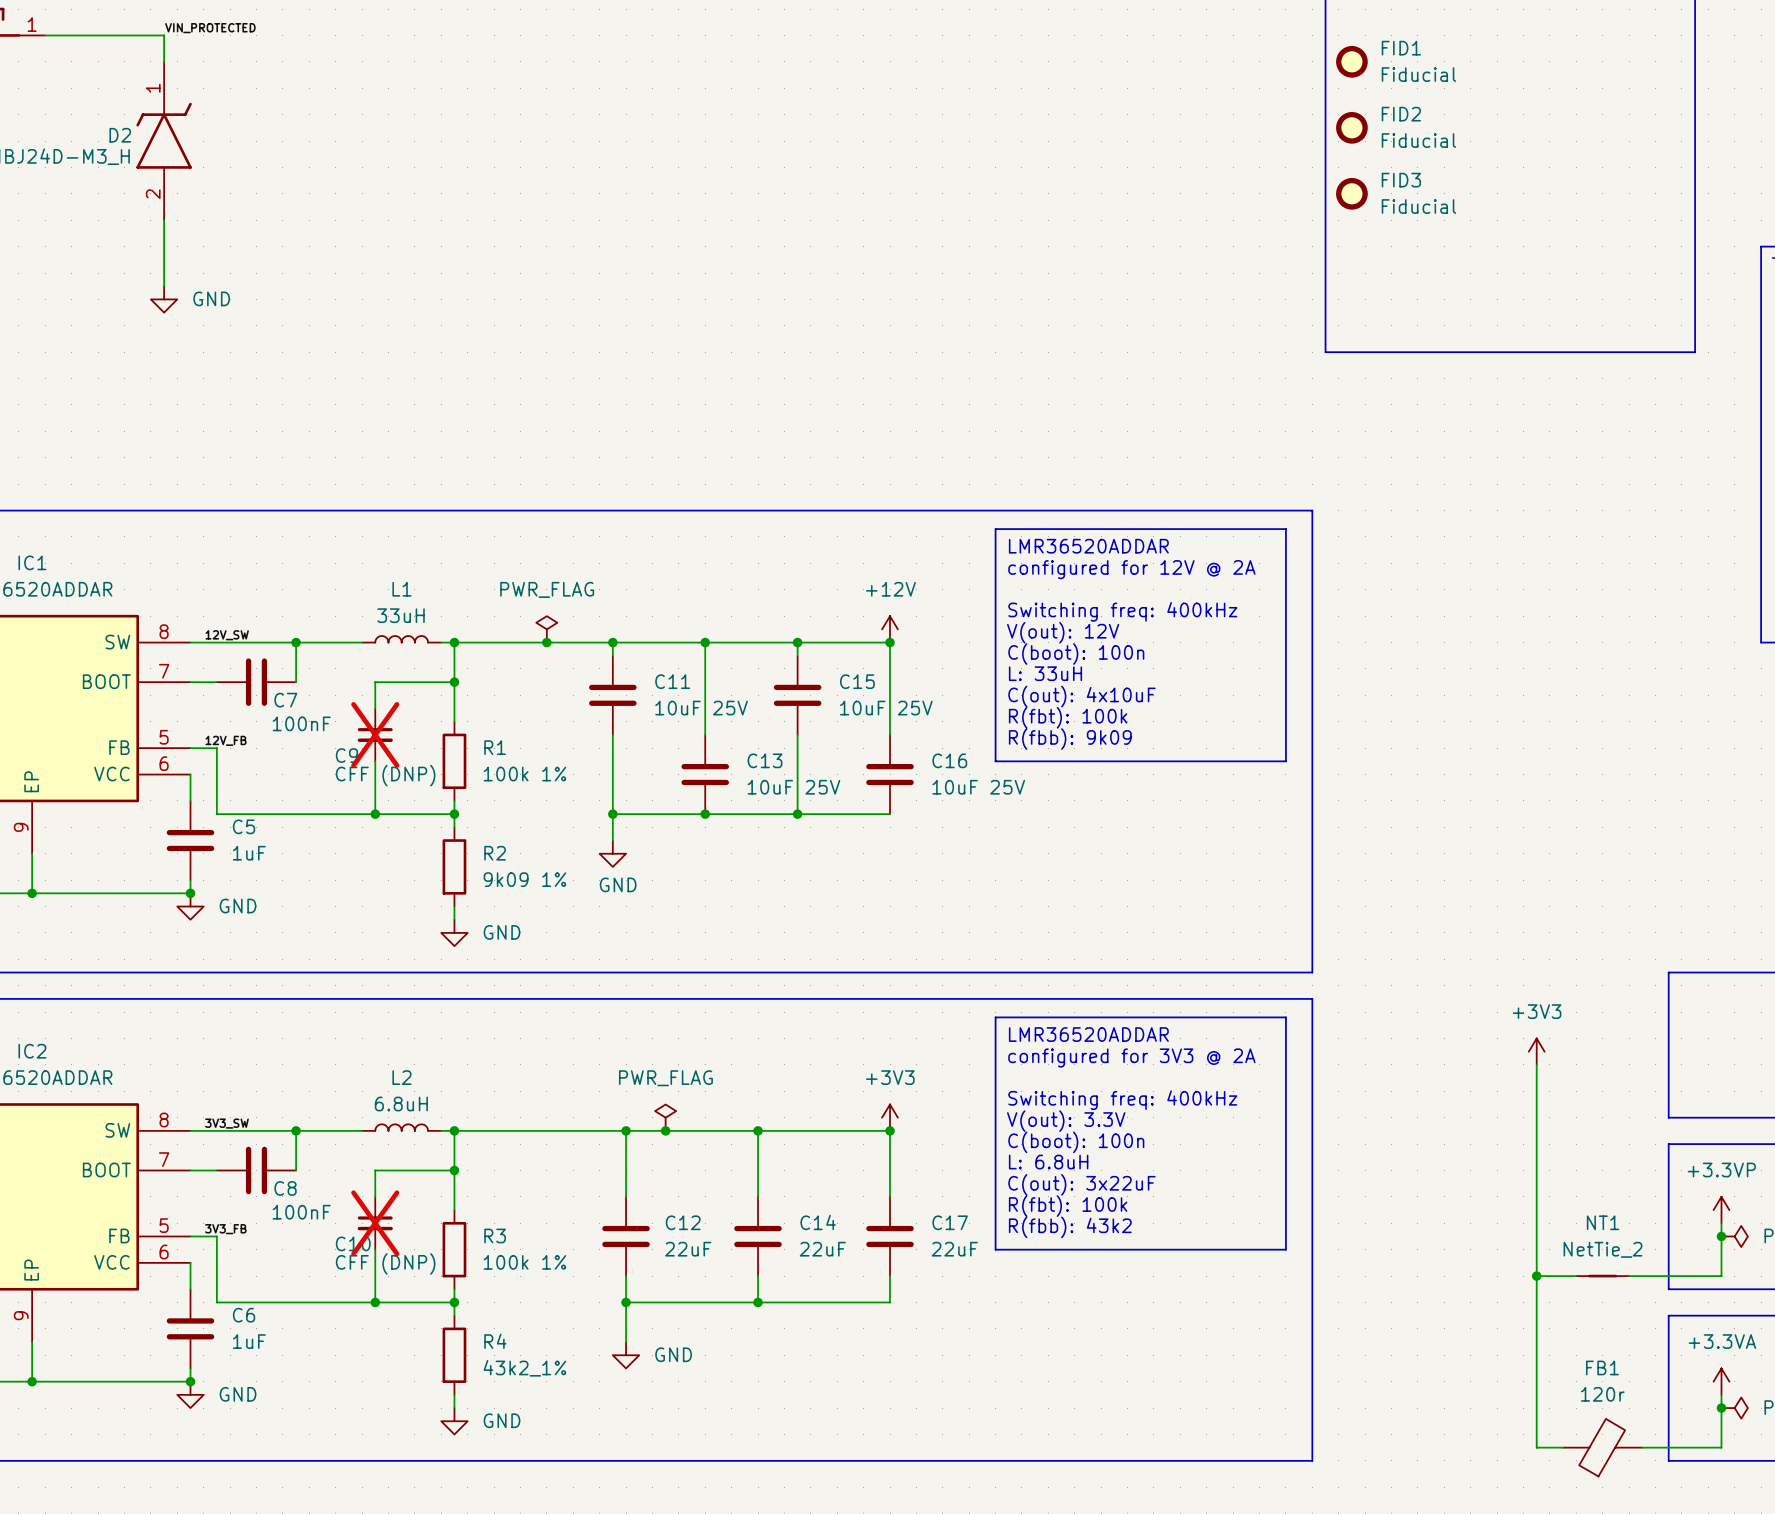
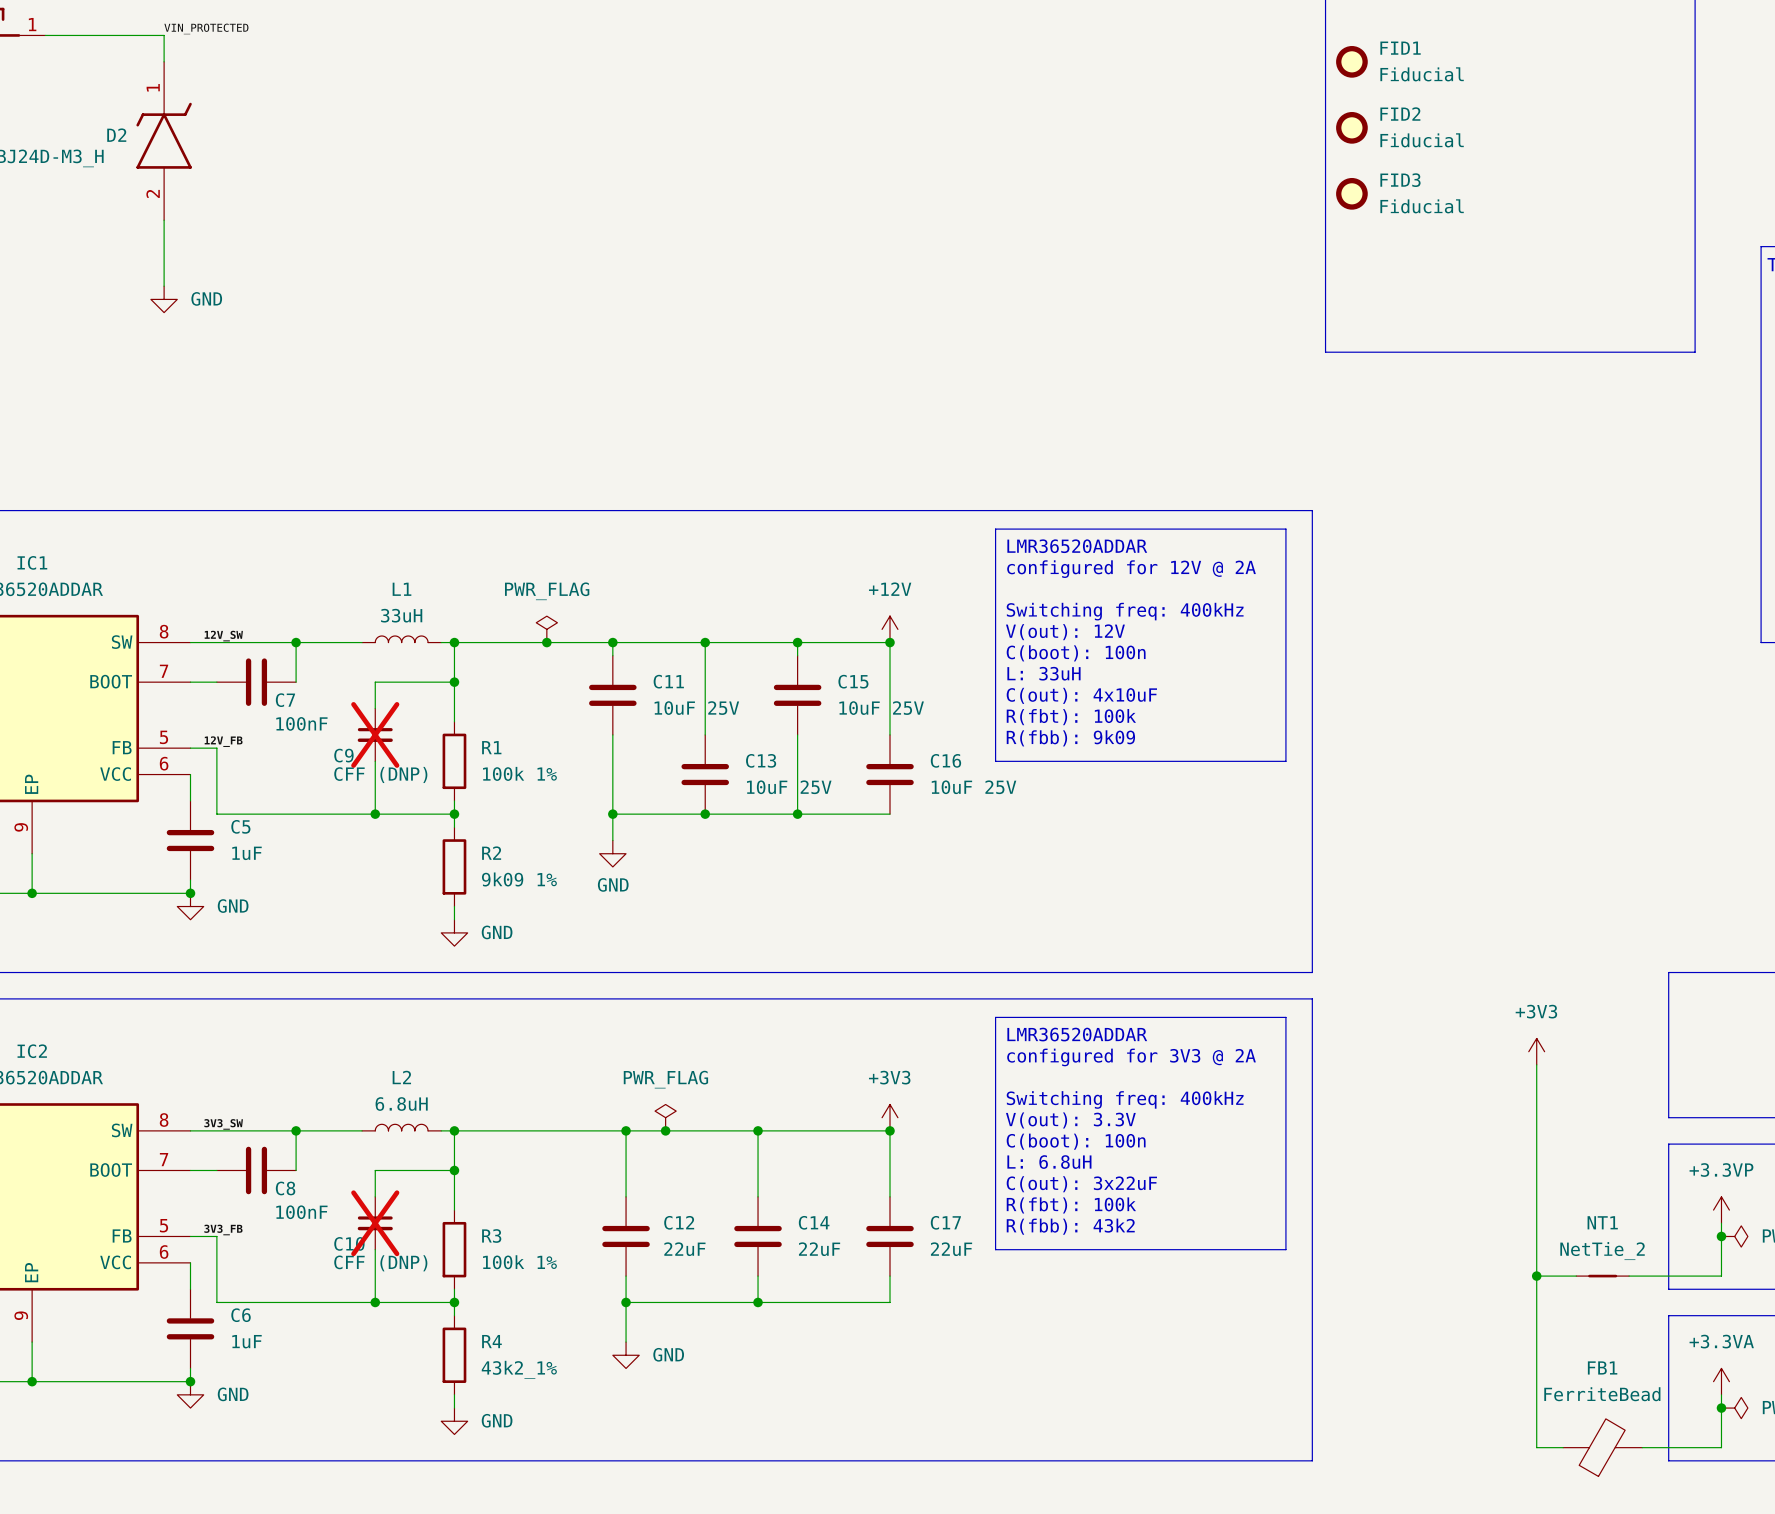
FB1 value: 120r (1602, 1394) -> FerriteBead (1602, 1394)

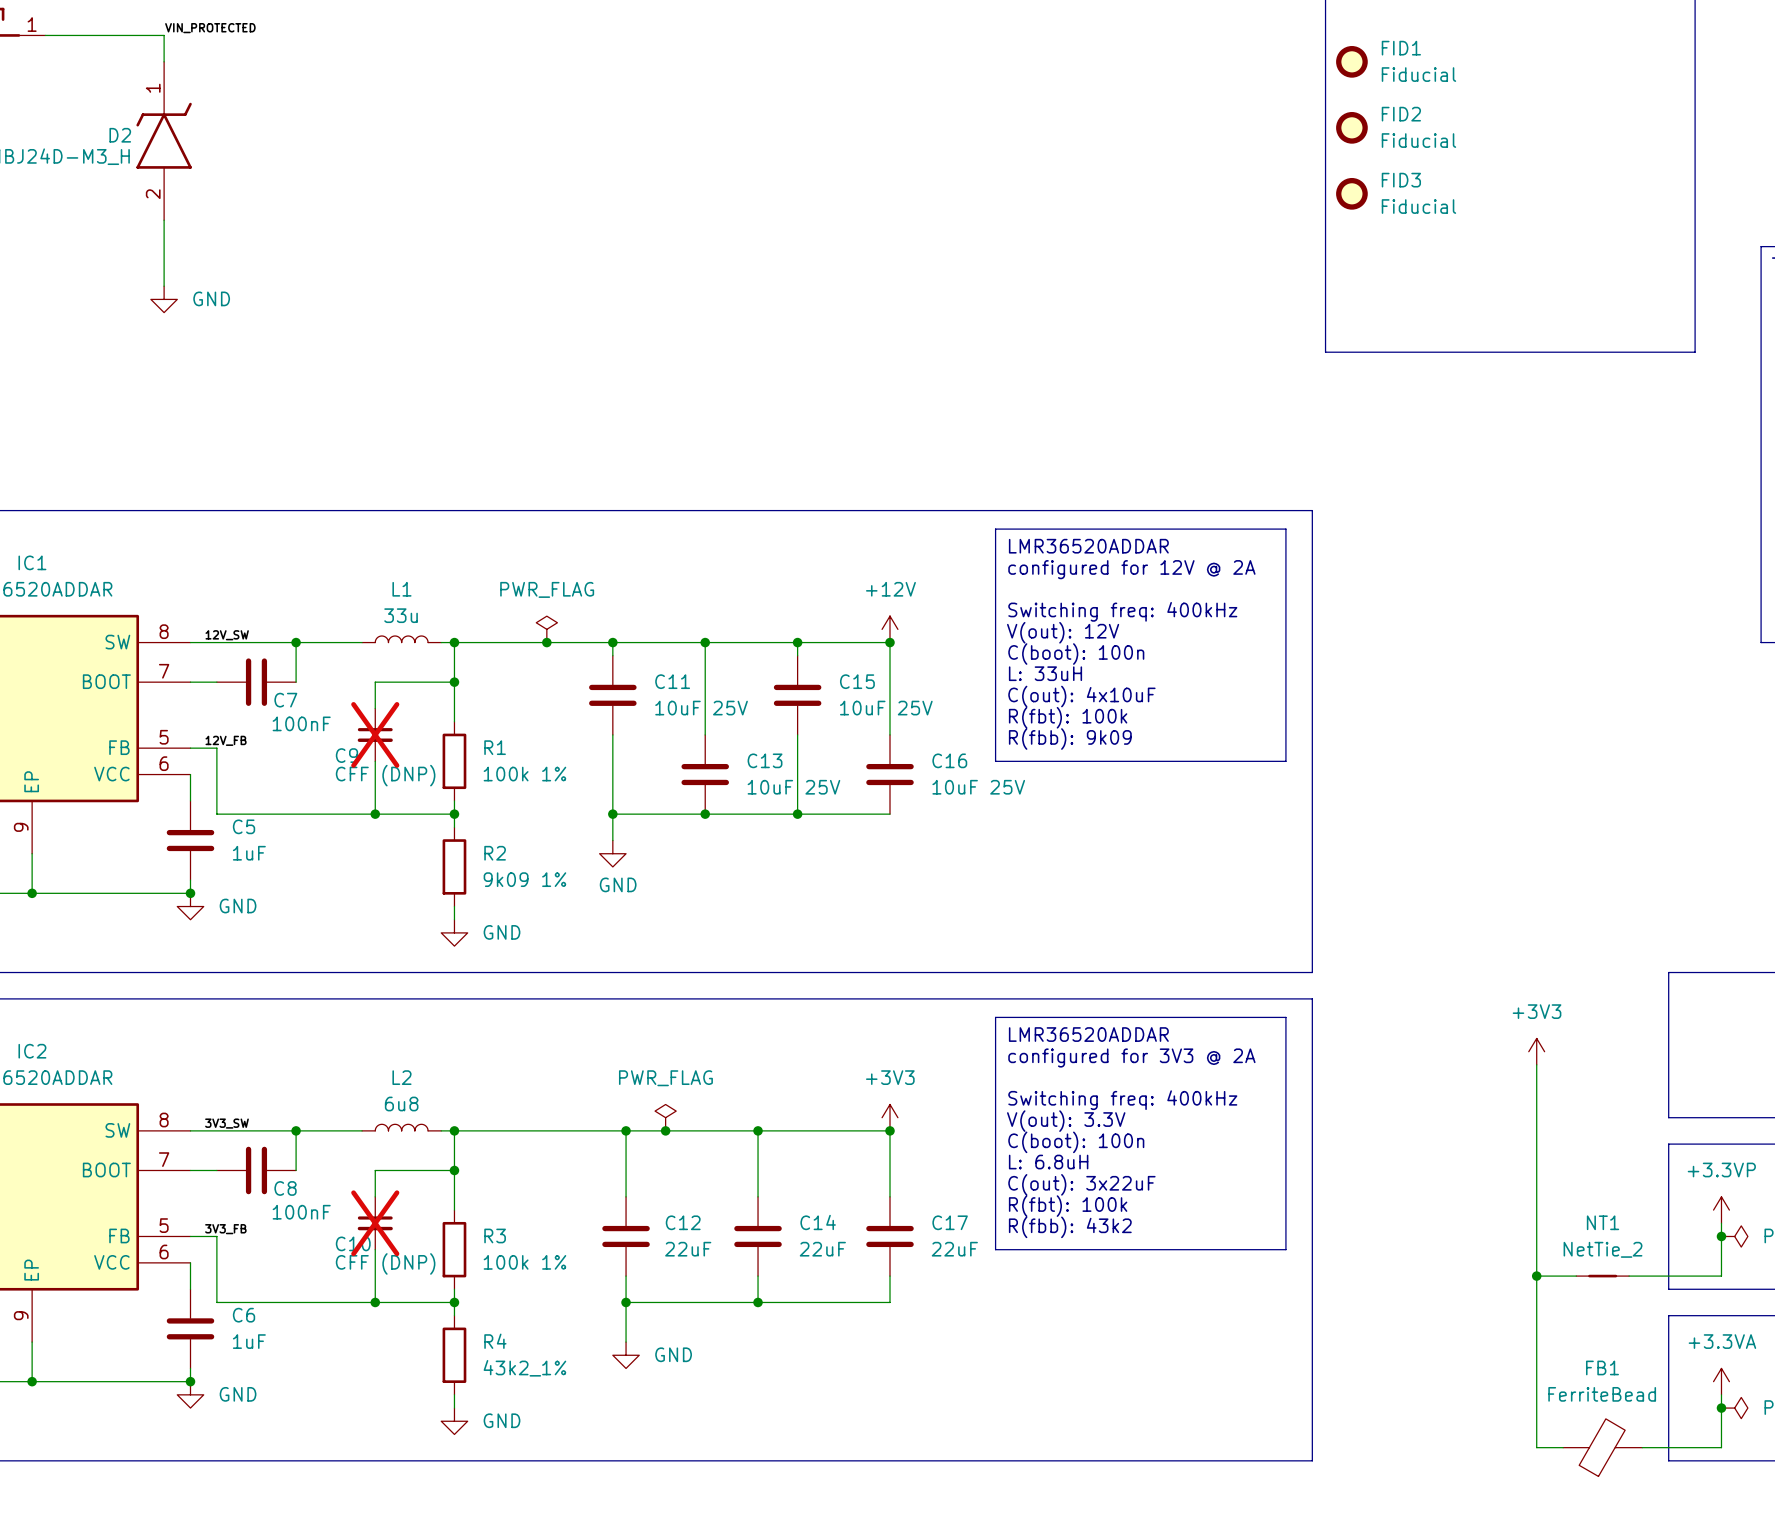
L1 value: 33uH (401, 615) -> 33u (401, 615)
L2 value: 6.8uH (401, 1104) -> 6u8 (401, 1104)

